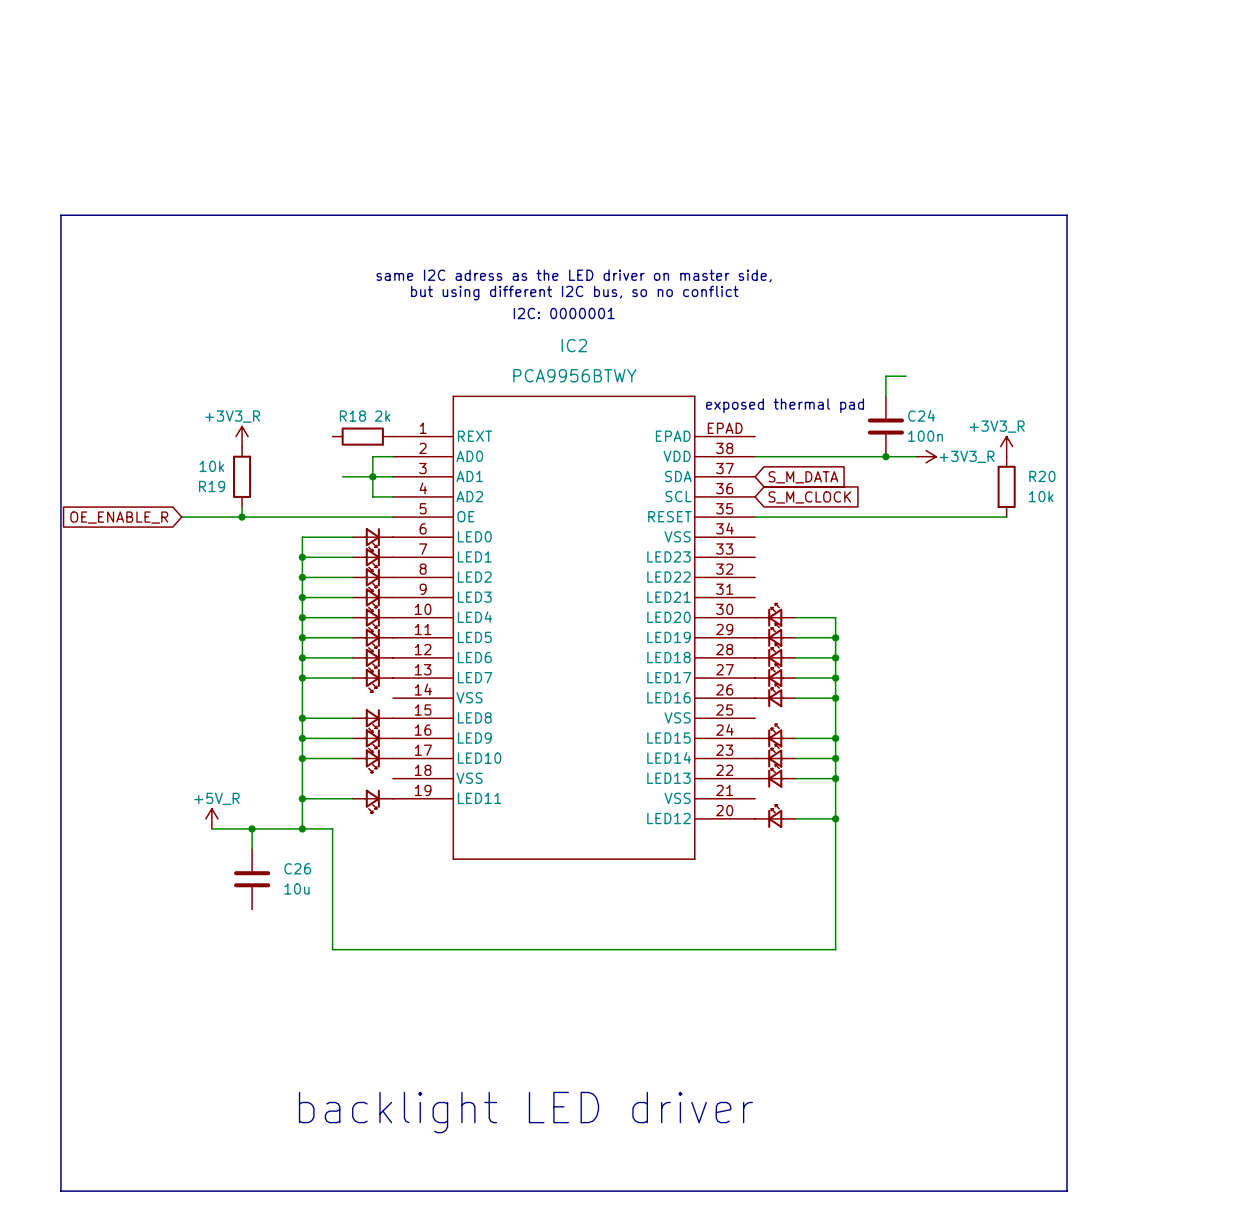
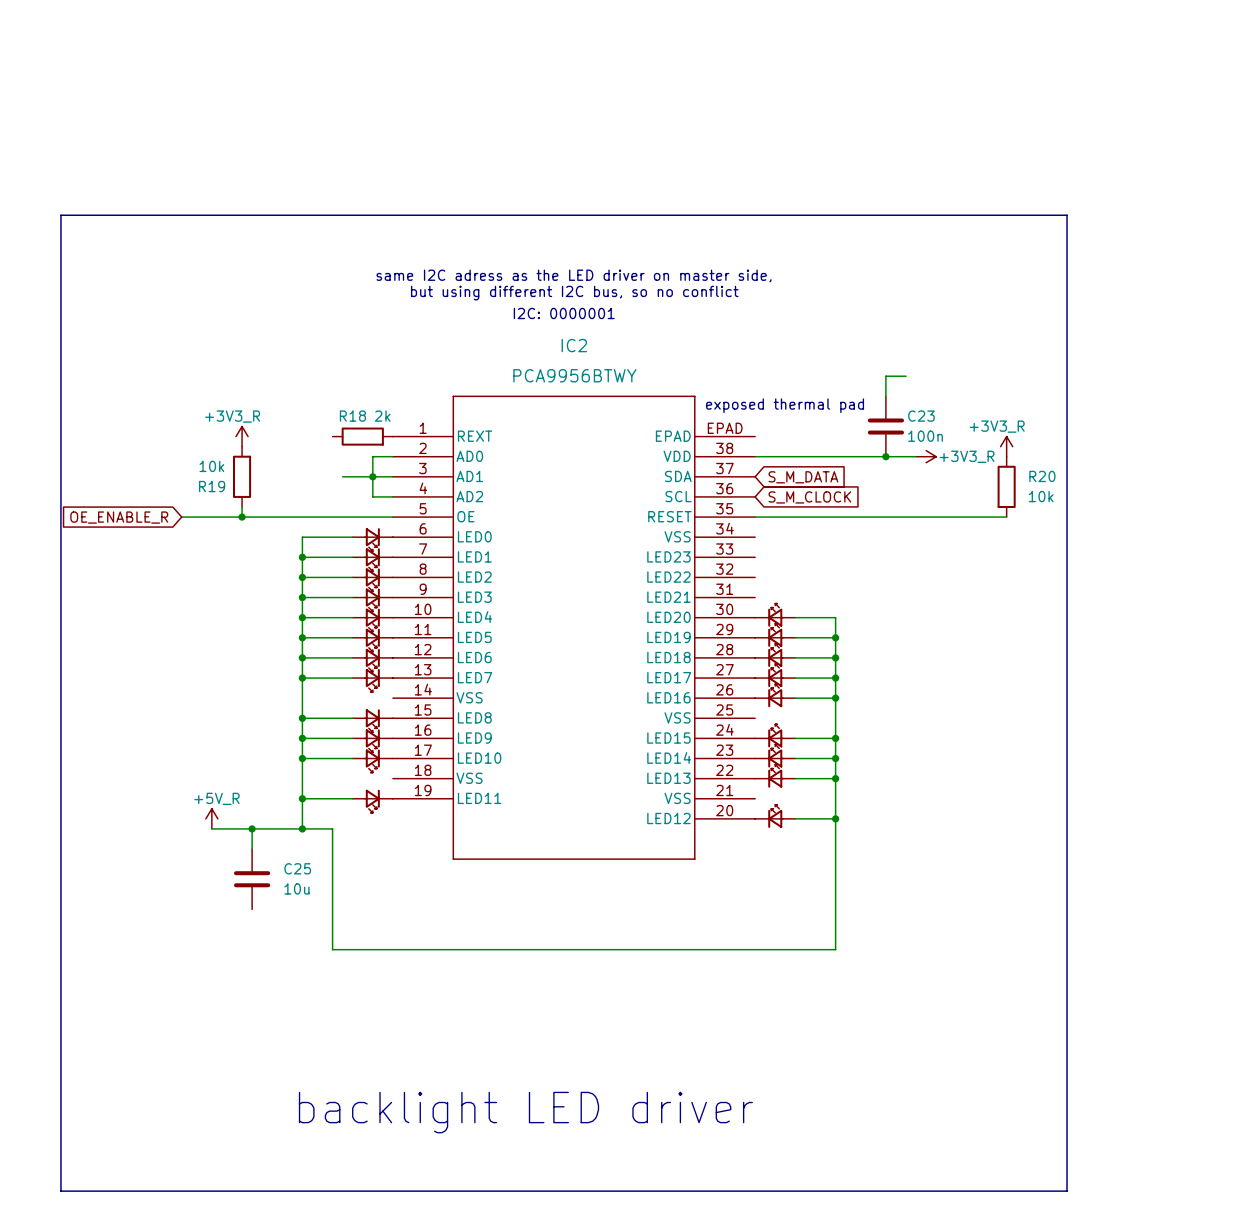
C24 name: C24 (921, 415) -> C23 (921, 416)
C26 name: C26 (297, 868) -> C25 (297, 868)

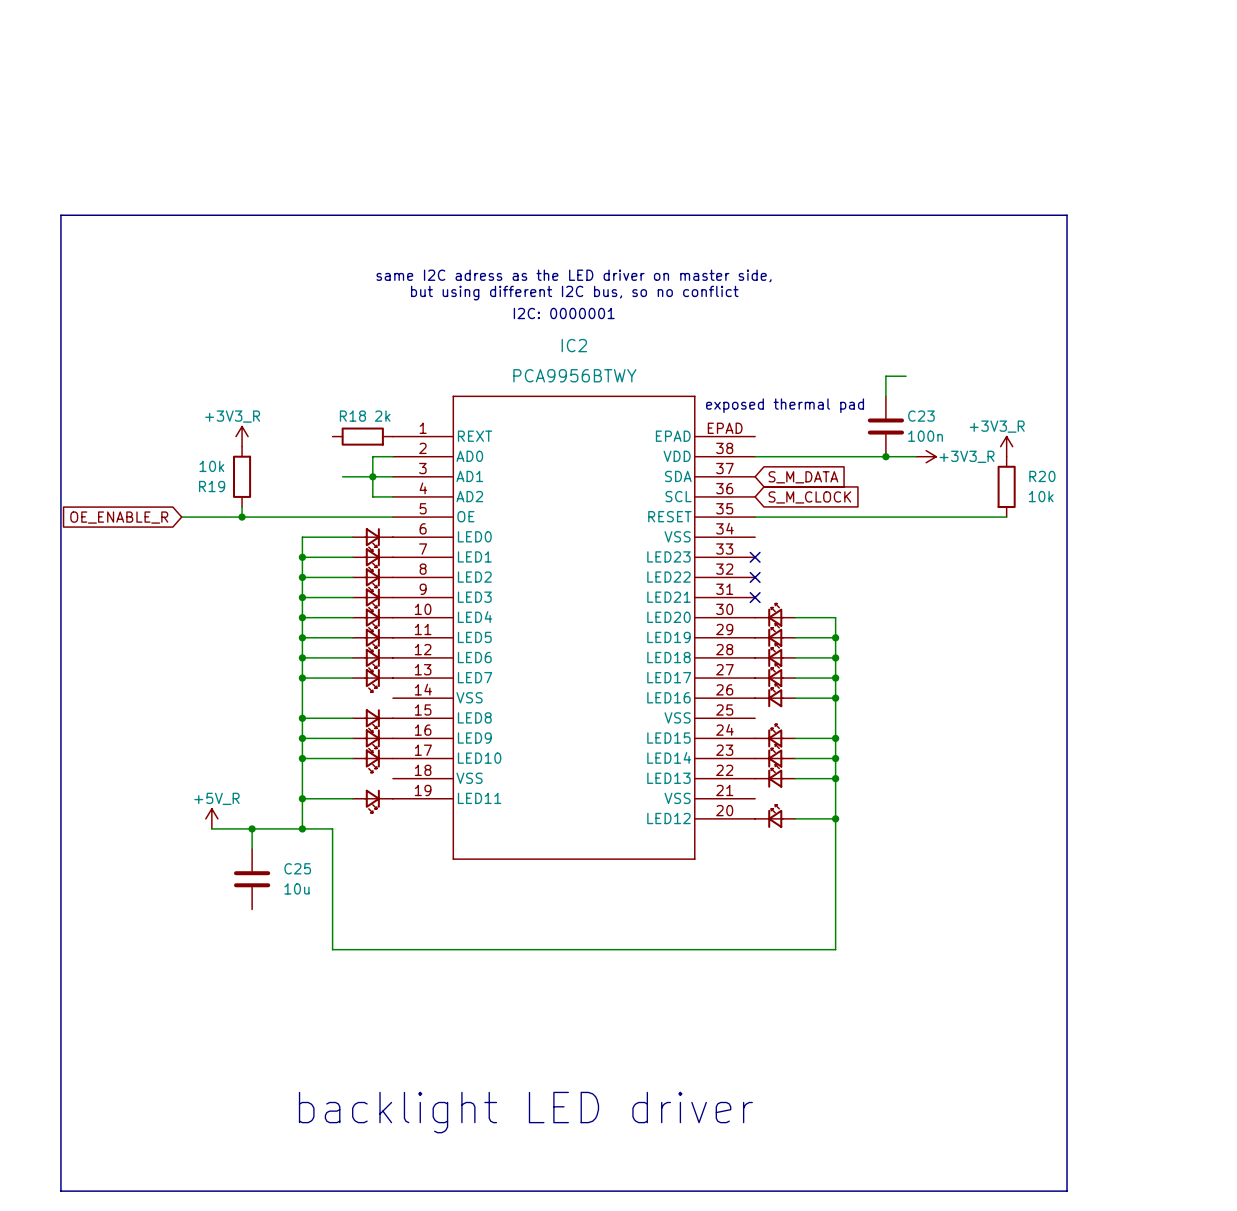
no-connect mark: none -> (755, 557)
no-connect mark: none -> (755, 577)
no-connect mark: none -> (755, 597)

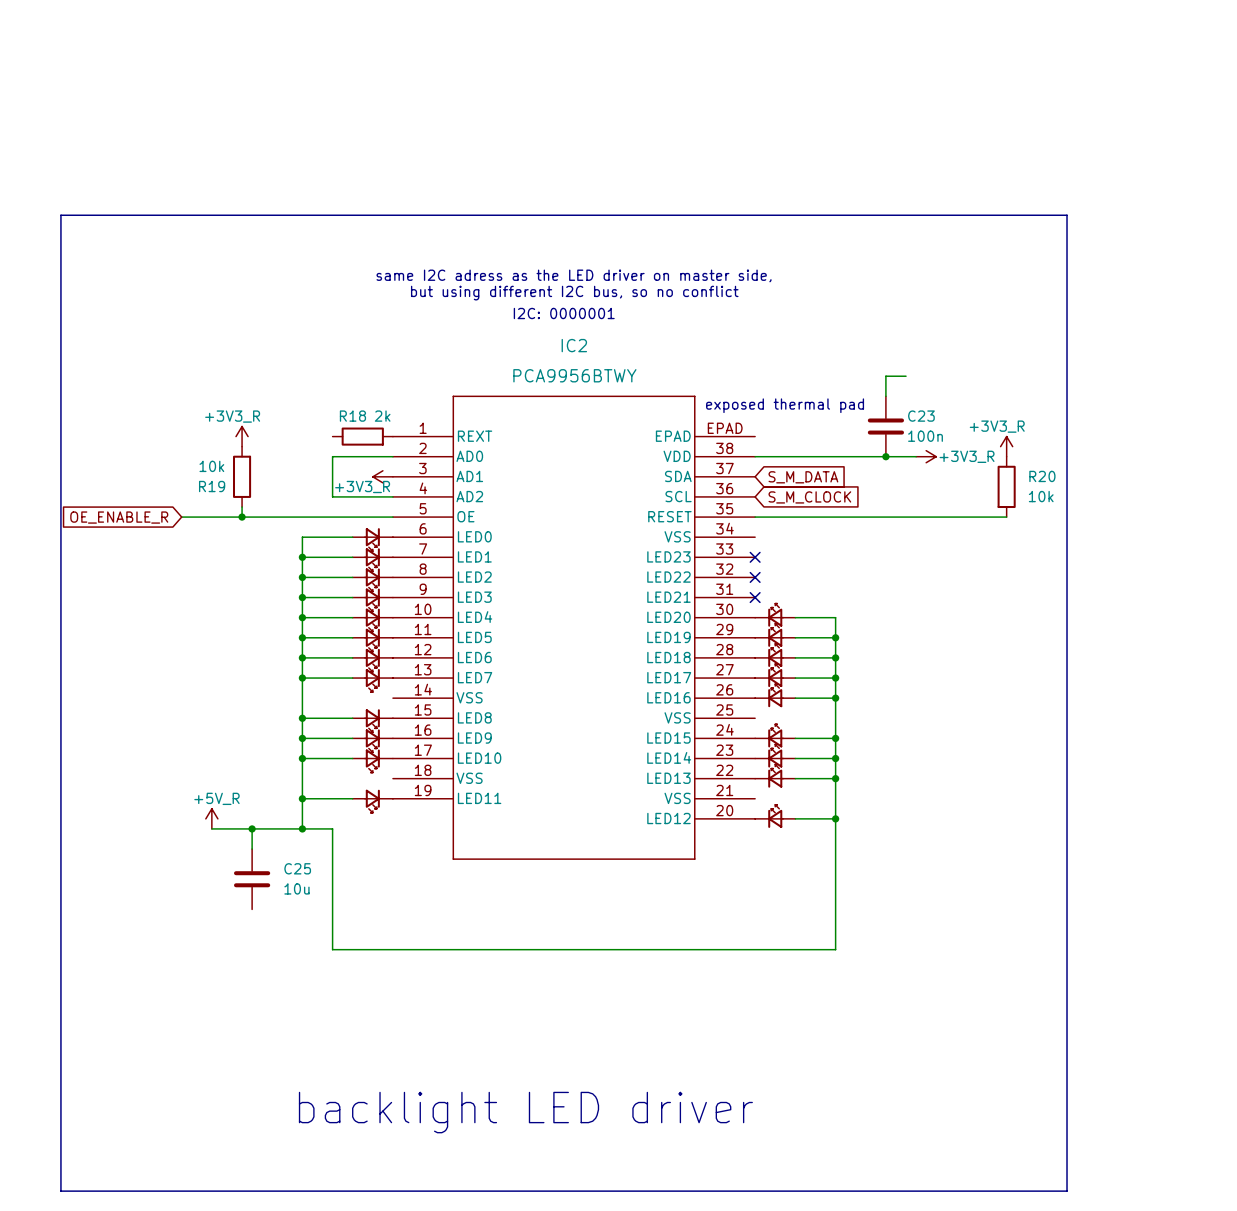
wire: (372, 456) (372, 496) -> (372, 456) (332, 456) (332, 496) (372, 496)
wire: (342, 476) (392, 476) -> none
junction: (372, 476) -> none
power symbol: none -> +3V3_R (382, 476)

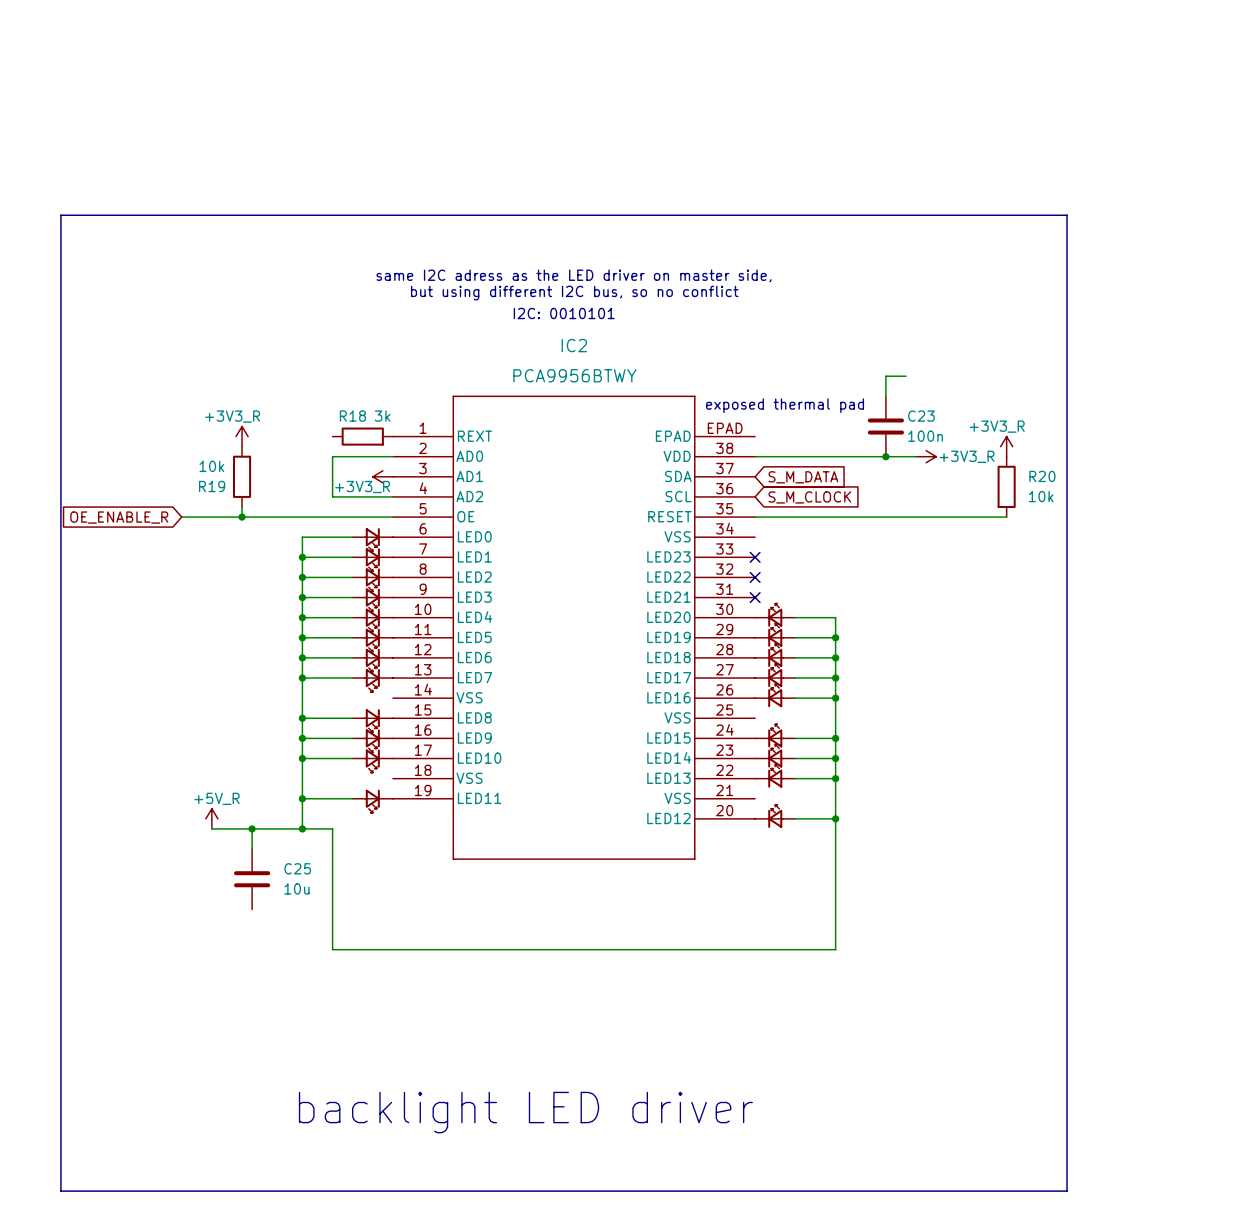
text: I2C: 0000001 (564, 313) -> I2C: 0010101 (564, 313)
R18 value: 2k (382, 416) -> 3k (382, 416)

